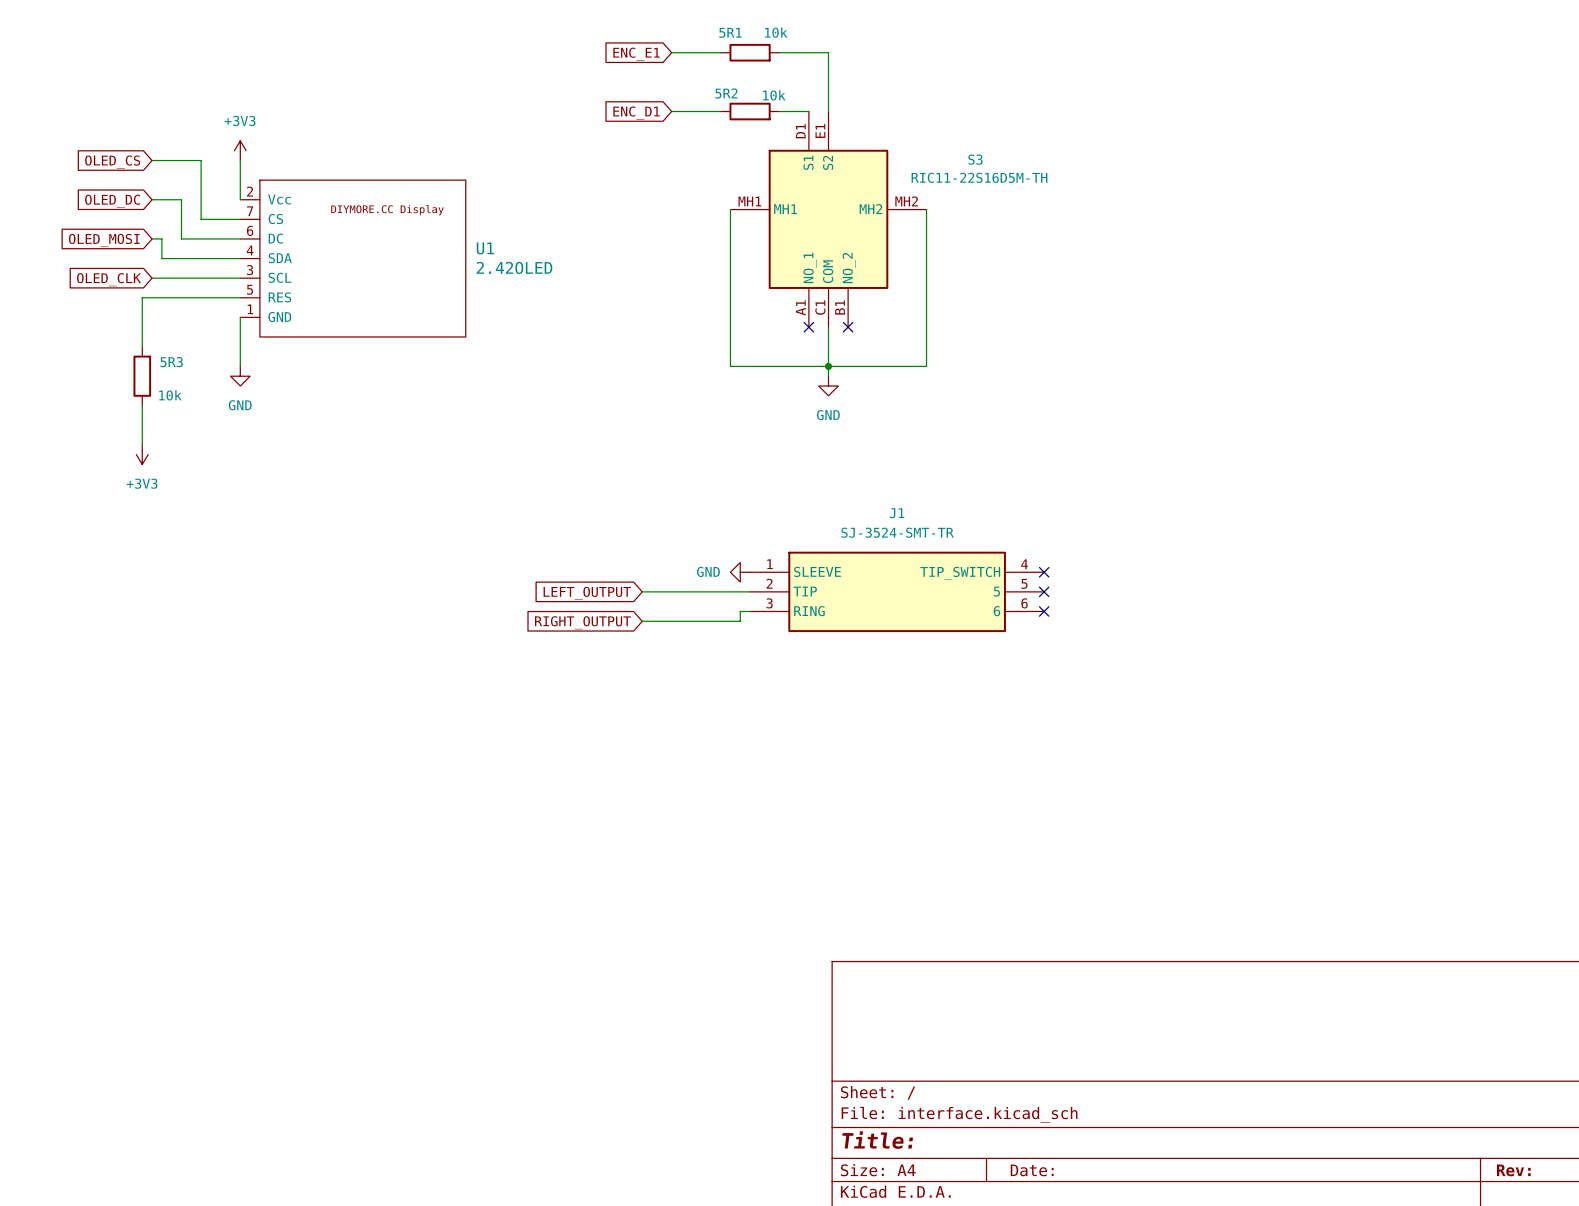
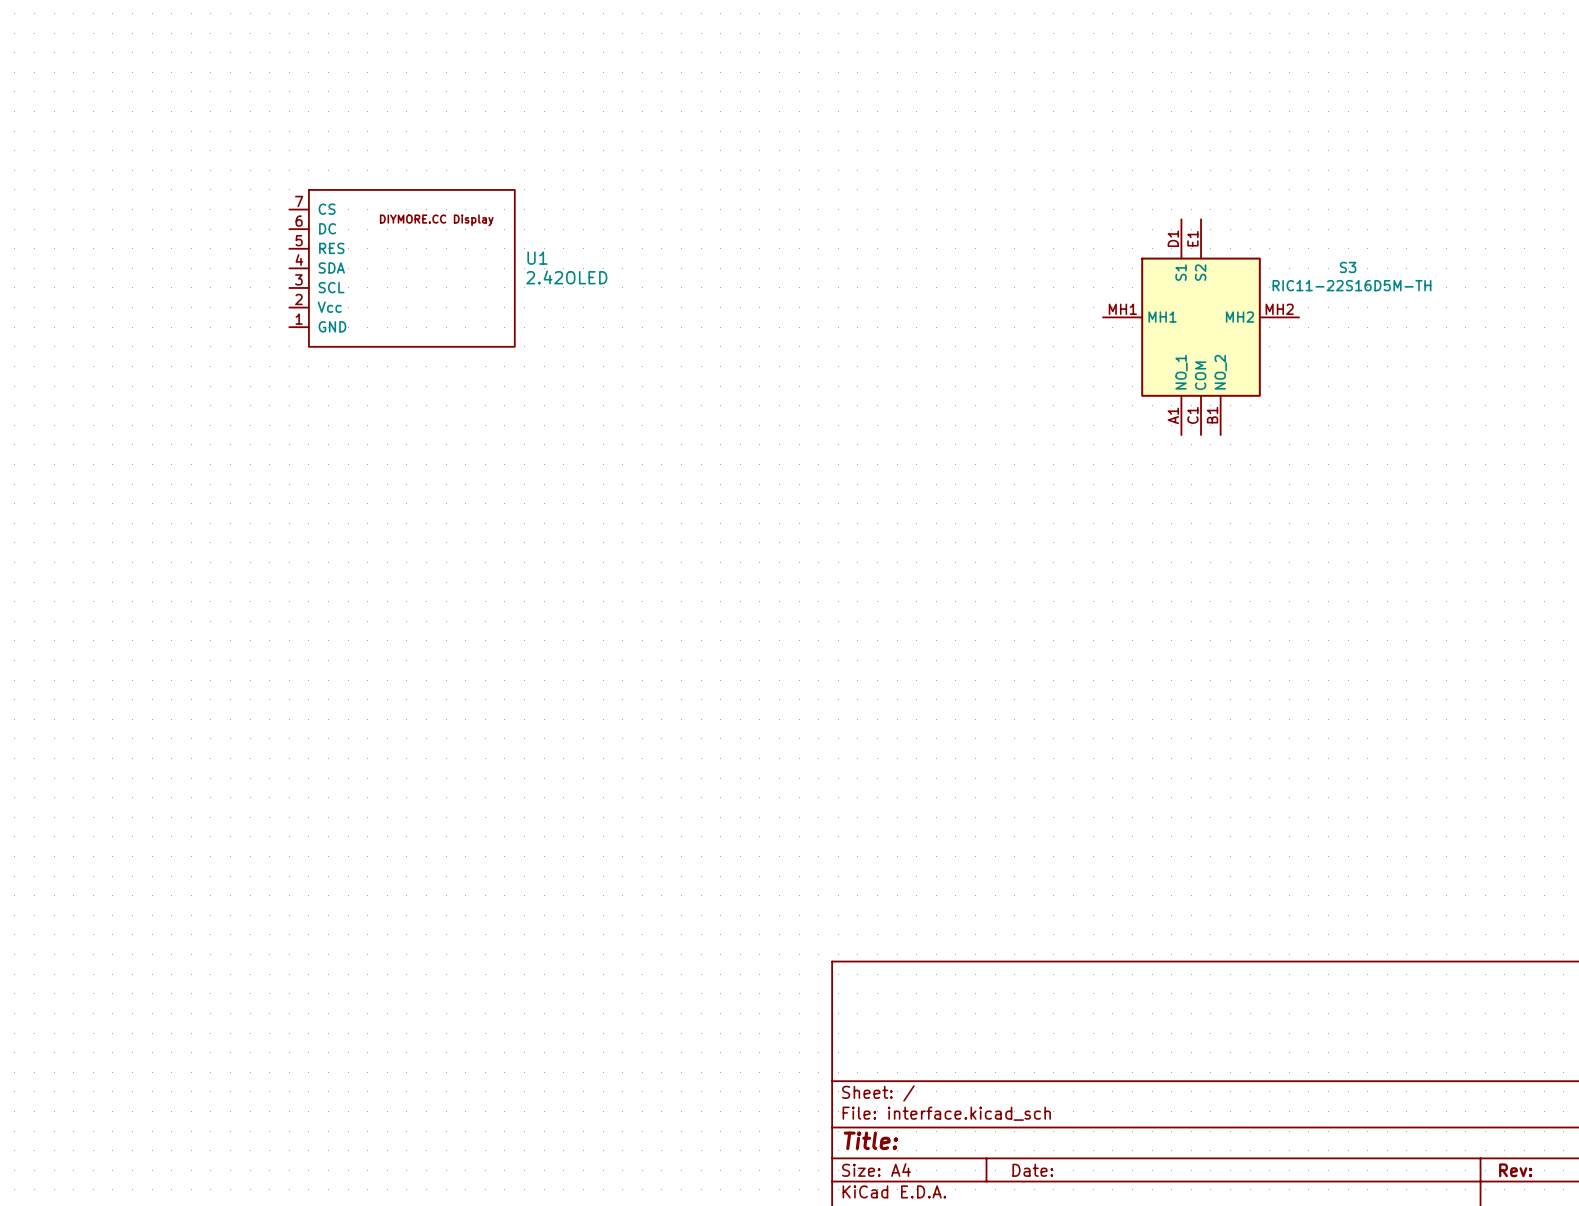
wire: (671, 52) (720, 52) -> none
5R1: 10k (750, 52) -> none
wire: (779, 52) (828, 52) (828, 111) -> none
global label: ENC_E1 (636, 54) -> none
wire: (671, 111) (720, 111) -> none
5R2: 10k (750, 111) -> none
wire: (779, 111) (808, 111) -> none
global label: ENC_D1 (636, 113) -> none
power symbol: +3V3 (240, 150) -> none
wire: (152, 160) (201, 160) (201, 219) (240, 219) -> none
wire: (240, 160) (240, 199) -> none
global label: OLED_CS (112, 162) -> none
U1 pin number: 2 (250, 191) -> 7 (299, 201)
wire: (152, 199) (181, 199) (181, 238) (240, 238) -> none
U1 pin name: Vcc (279, 199) -> CS (327, 209)
global label: OLED_DC (112, 201) -> none
wire: (730, 209) (730, 366) (926, 366) (926, 209) -> none
U1 pin number: 7 (250, 211) -> 6 (299, 221)
U1 pin name: CS (275, 219) -> DC (327, 228)
S3 position: (828, 219) -> (1201, 327)
U1 pin number: 6 (250, 230) -> 5 (299, 240)
wire: (152, 238) (161, 238) (161, 258) (240, 258) -> none
U1 pin name: DC (275, 238) -> RES (331, 248)
global label: OLED_MOSI (104, 240) -> none
U1 position: (353, 258) -> (402, 268)
wire: (152, 278) (240, 278) -> none
global label: OLED_CLK (109, 279) -> none
U1 pin number: 5 (250, 289) -> 2 (298, 299)
wire: (240, 297) (142, 297) (142, 346) -> none
U1 pin name: RES (279, 297) -> Vcc (329, 307)
wire: (240, 317) (240, 366) -> none
no-connect mark: (808, 327) -> none
wire: (828, 327) (828, 376) -> none
no-connect mark: (848, 327) -> none
junction: (828, 366) -> none
5R3: 10k (142, 376) -> none
power symbol: GND (240, 376) -> none
power symbol: GND (828, 386) -> none
wire: (142, 405) (142, 444) -> none
power symbol: +3V3 (142, 454) -> none
power symbol: GND (740, 572) -> none
no-connect mark: (1044, 572) -> none
wire: (642, 591) (750, 591) -> none
J1: SJ-3524-SMT-TR (897, 591) -> none
no-connect mark: (1044, 591) -> none
global label: LEFT_OUTPUT (587, 593) -> none
wire: (750, 611) (740, 611) (740, 621) (642, 621) -> none
no-connect mark: (1044, 611) -> none
global label: RIGHT_OUTPUT (582, 622) -> none

